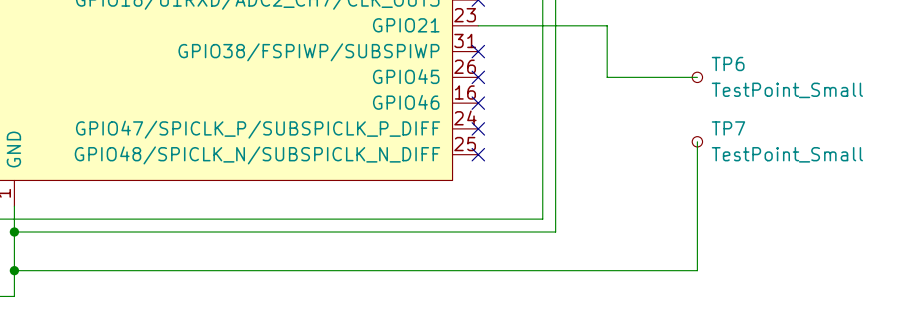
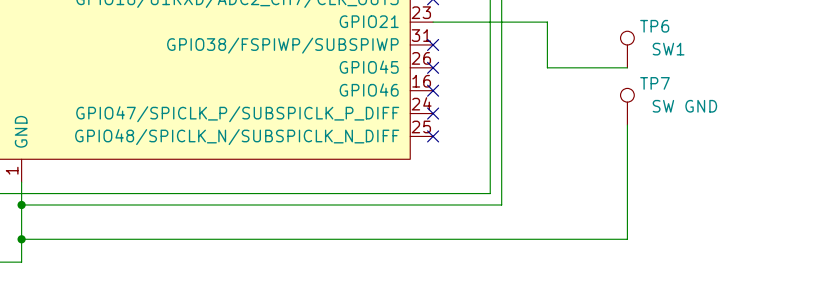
TP6 symbol: [692, 72, 703, 83] -> [620, 31, 635, 68]
TP6 value: TestPoint_Small (787, 90) -> SW1 (668, 49)
TP7 symbol: [692, 136, 703, 147] -> [620, 88, 635, 125]
TP7 value: TestPoint_Small (787, 154) -> SW GND (684, 106)

